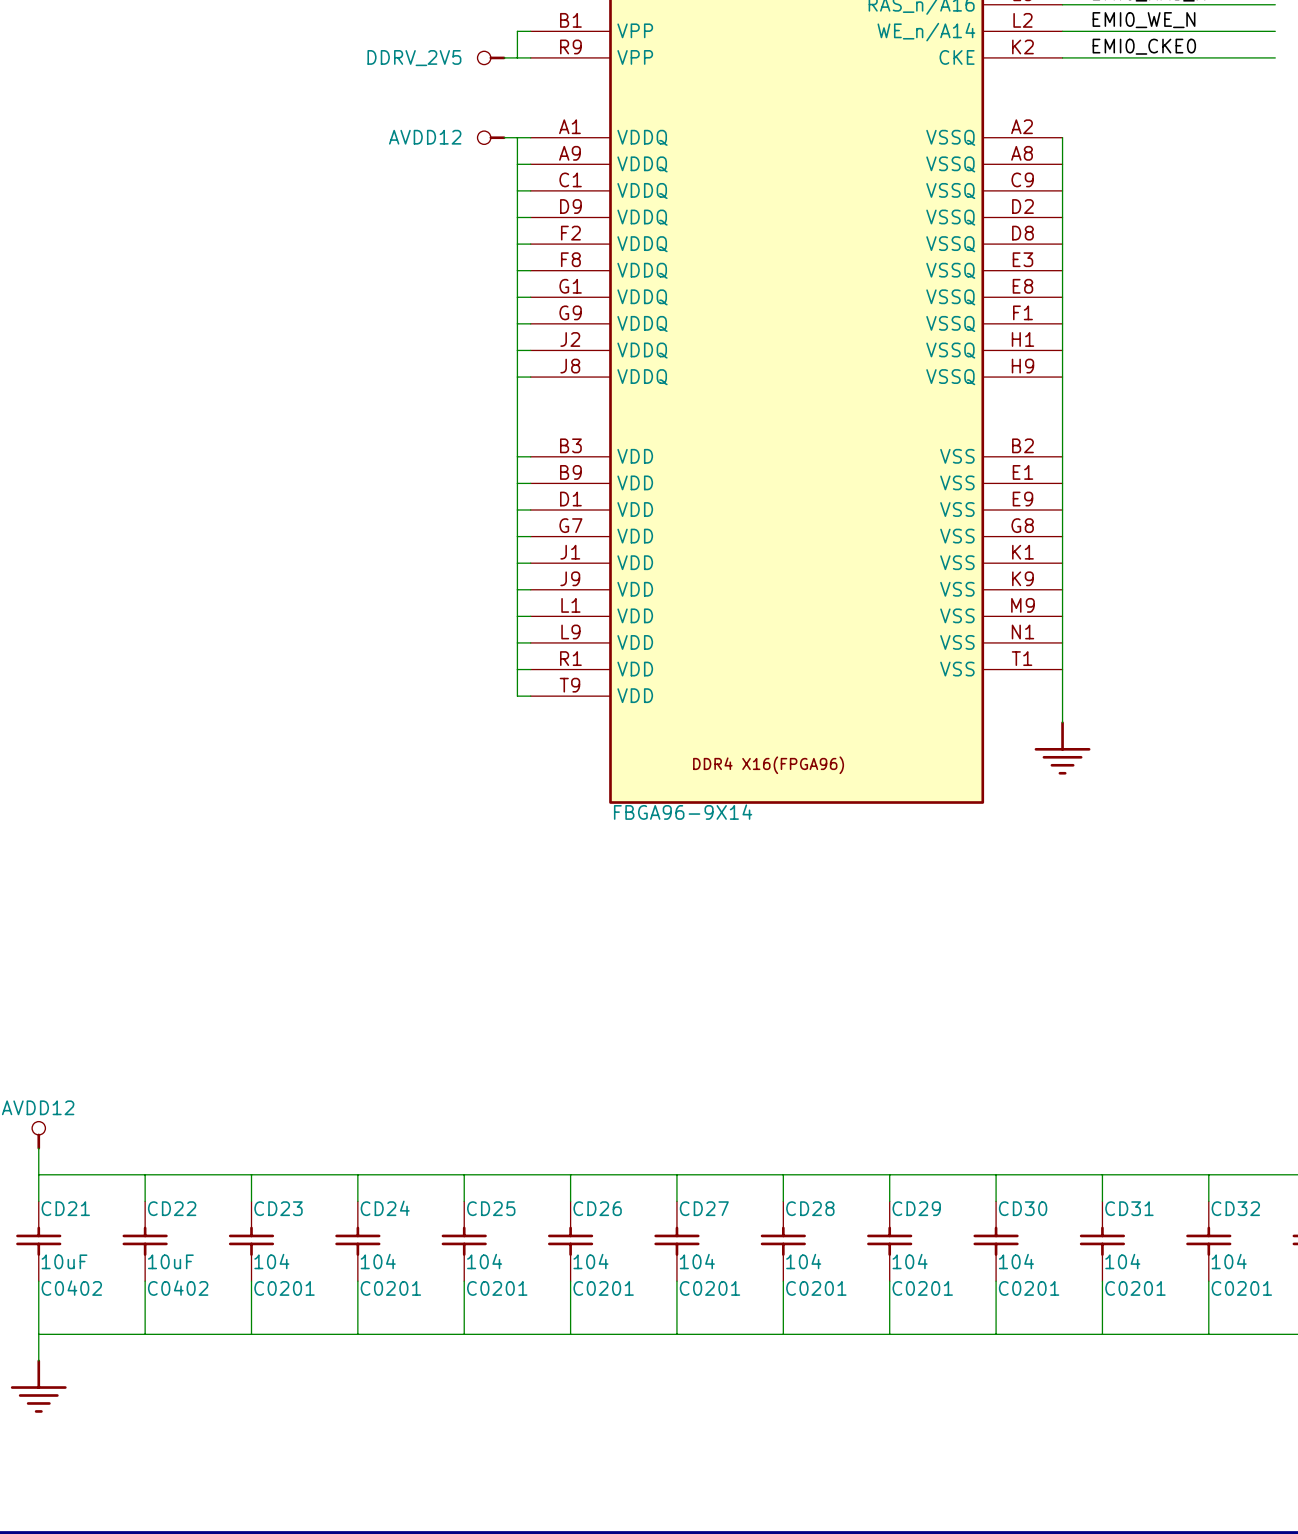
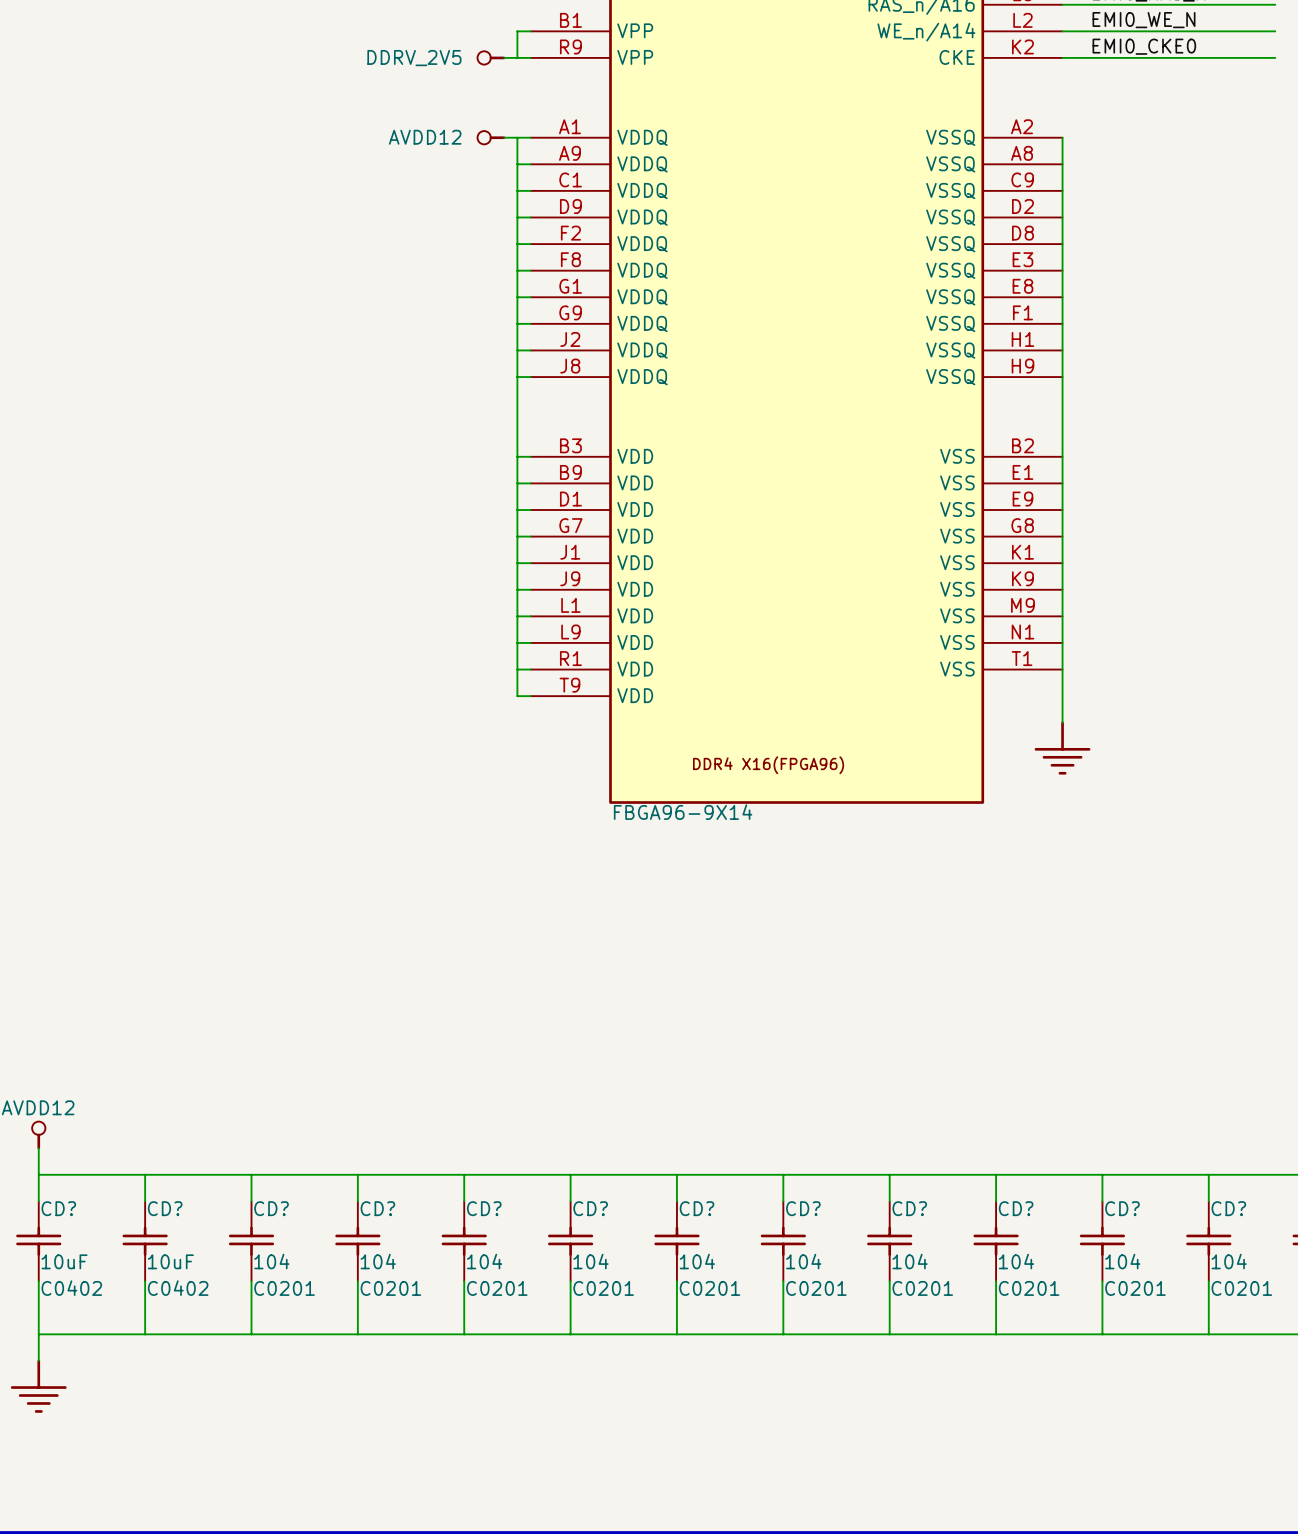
CD21 name: CD21 (65, 1208) -> CD? (58, 1208)
CD22 name: CD22 (172, 1208) -> CD? (165, 1208)
CD23 name: CD23 (278, 1208) -> CD? (271, 1208)
CD24 name: CD24 (385, 1208) -> CD? (377, 1208)
CD25 name: CD25 (491, 1208) -> CD? (484, 1208)
CD26 name: CD26 (597, 1208) -> CD? (590, 1208)
CD27 name: CD27 (704, 1208) -> CD? (697, 1208)
CD28 name: CD28 (810, 1208) -> CD? (803, 1208)
CD29 name: CD29 (916, 1208) -> CD? (909, 1208)
CD30 name: CD30 (1023, 1208) -> CD? (1016, 1208)
CD31 name: CD31 (1129, 1208) -> CD? (1122, 1208)
CD32 name: CD32 (1235, 1208) -> CD? (1228, 1208)

